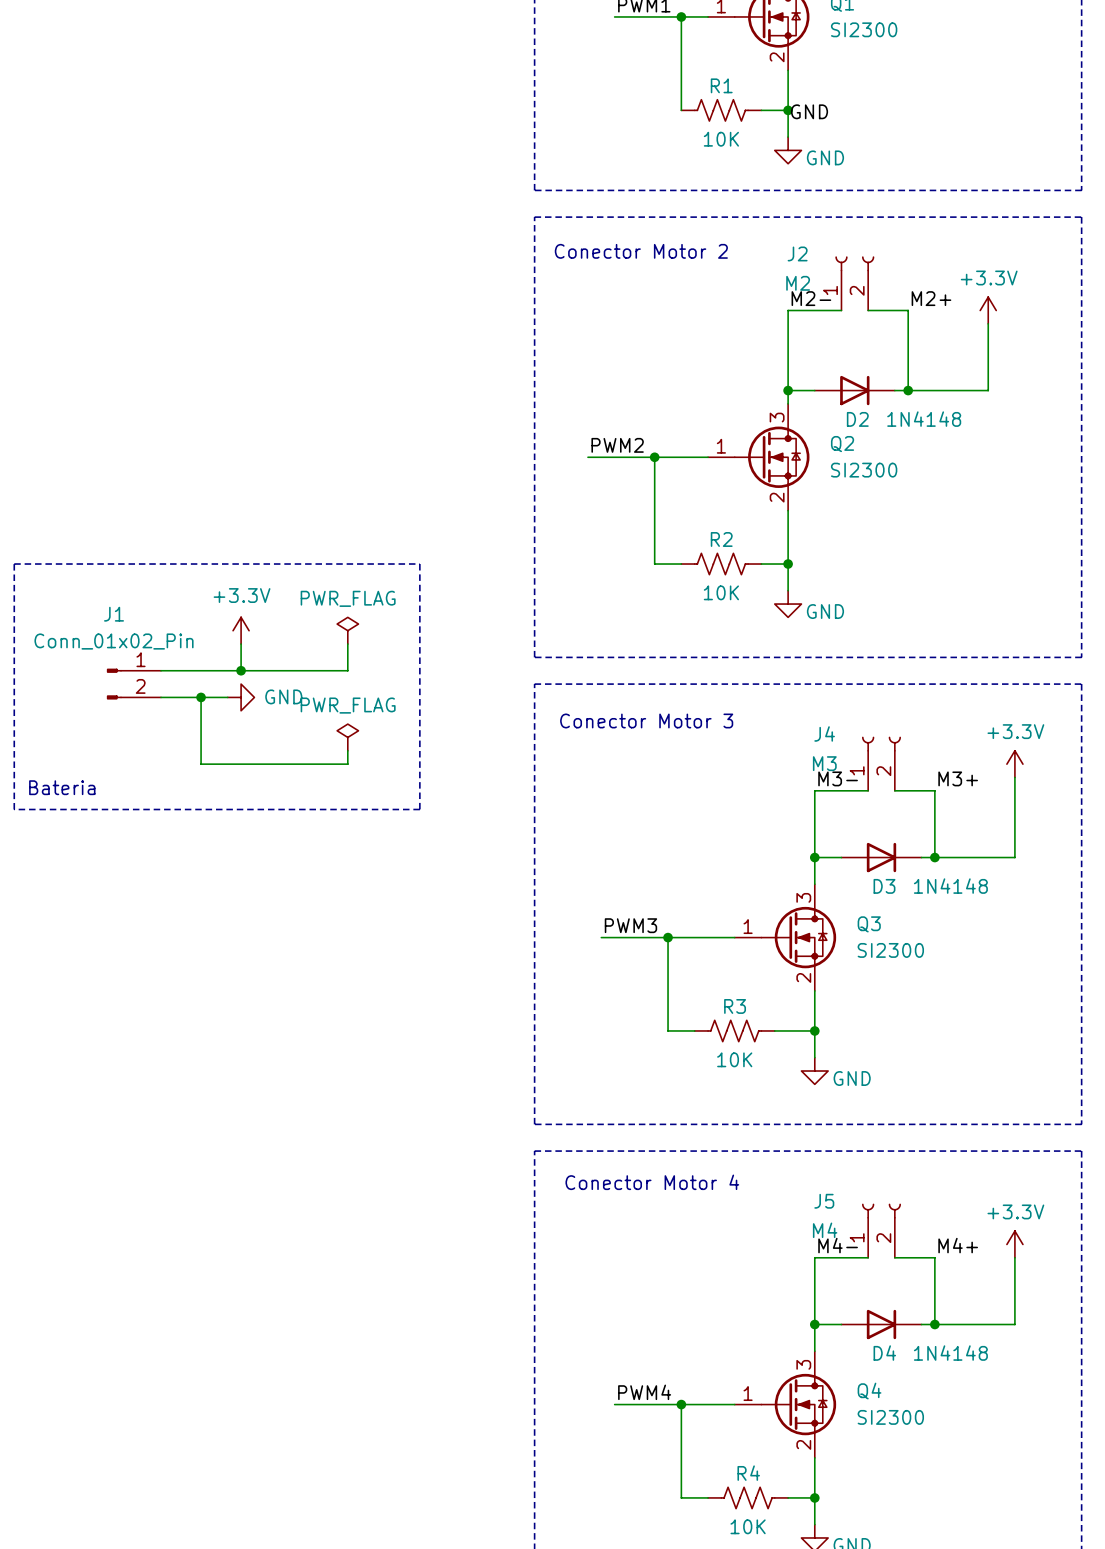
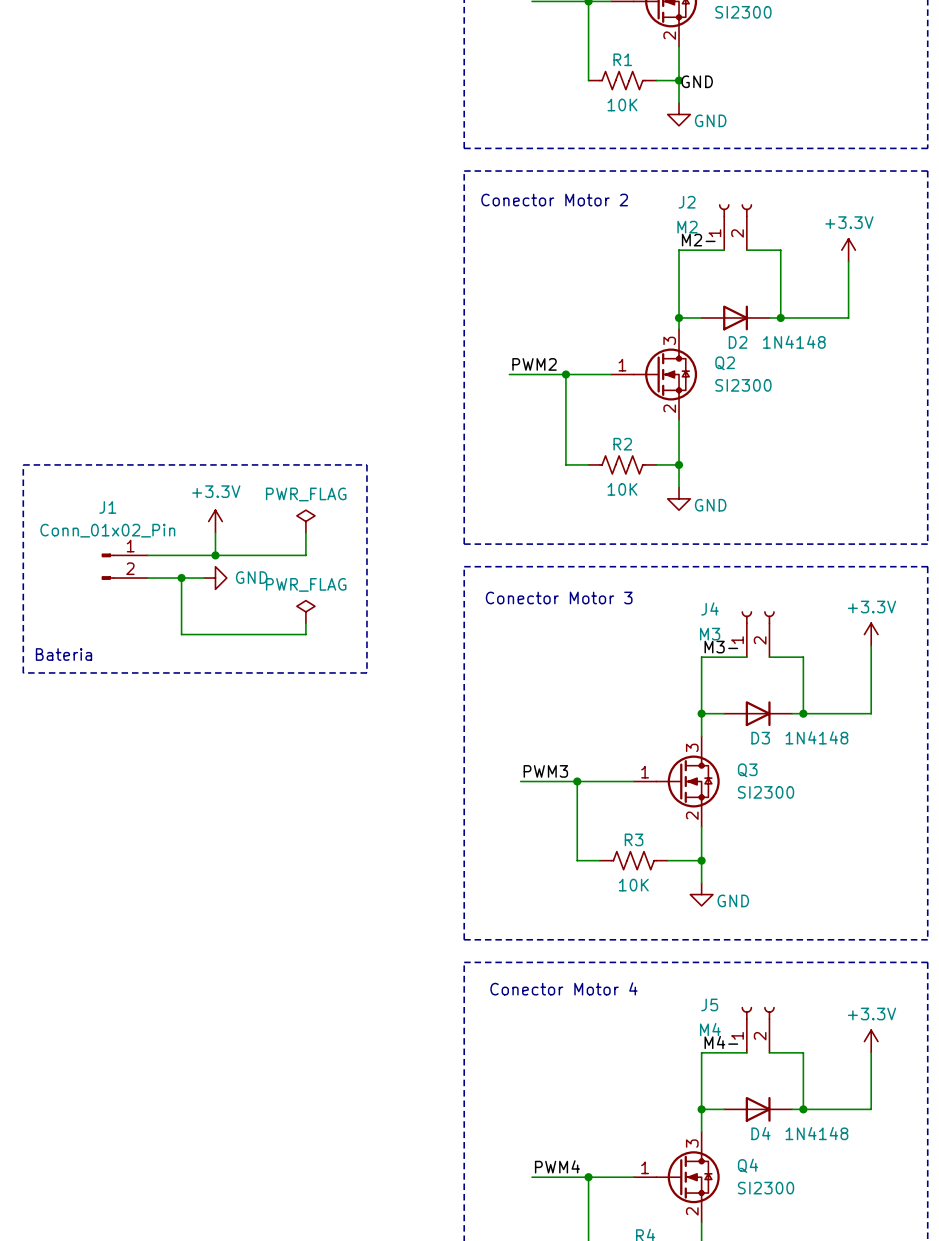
label: M2+ (931, 298) -> none
label: M3+ (958, 778) -> none
label: M4+ (958, 1245) -> none

